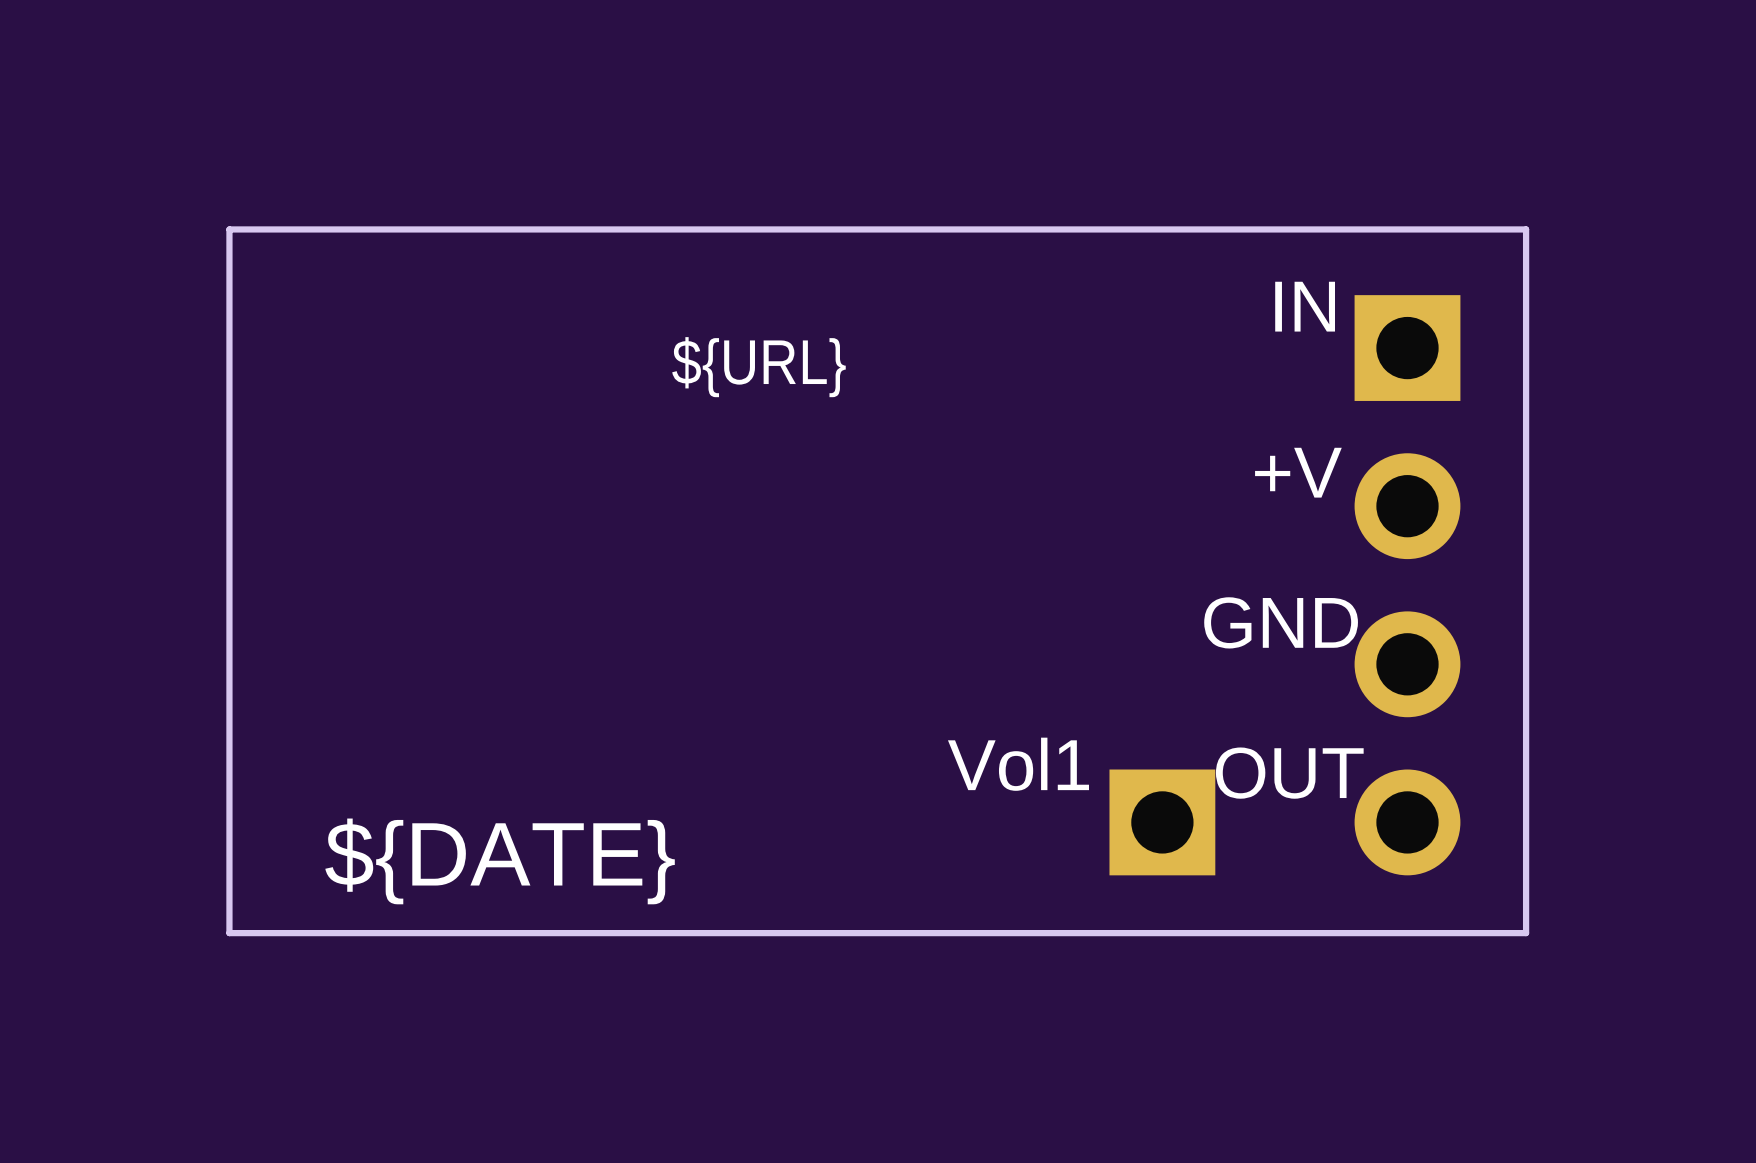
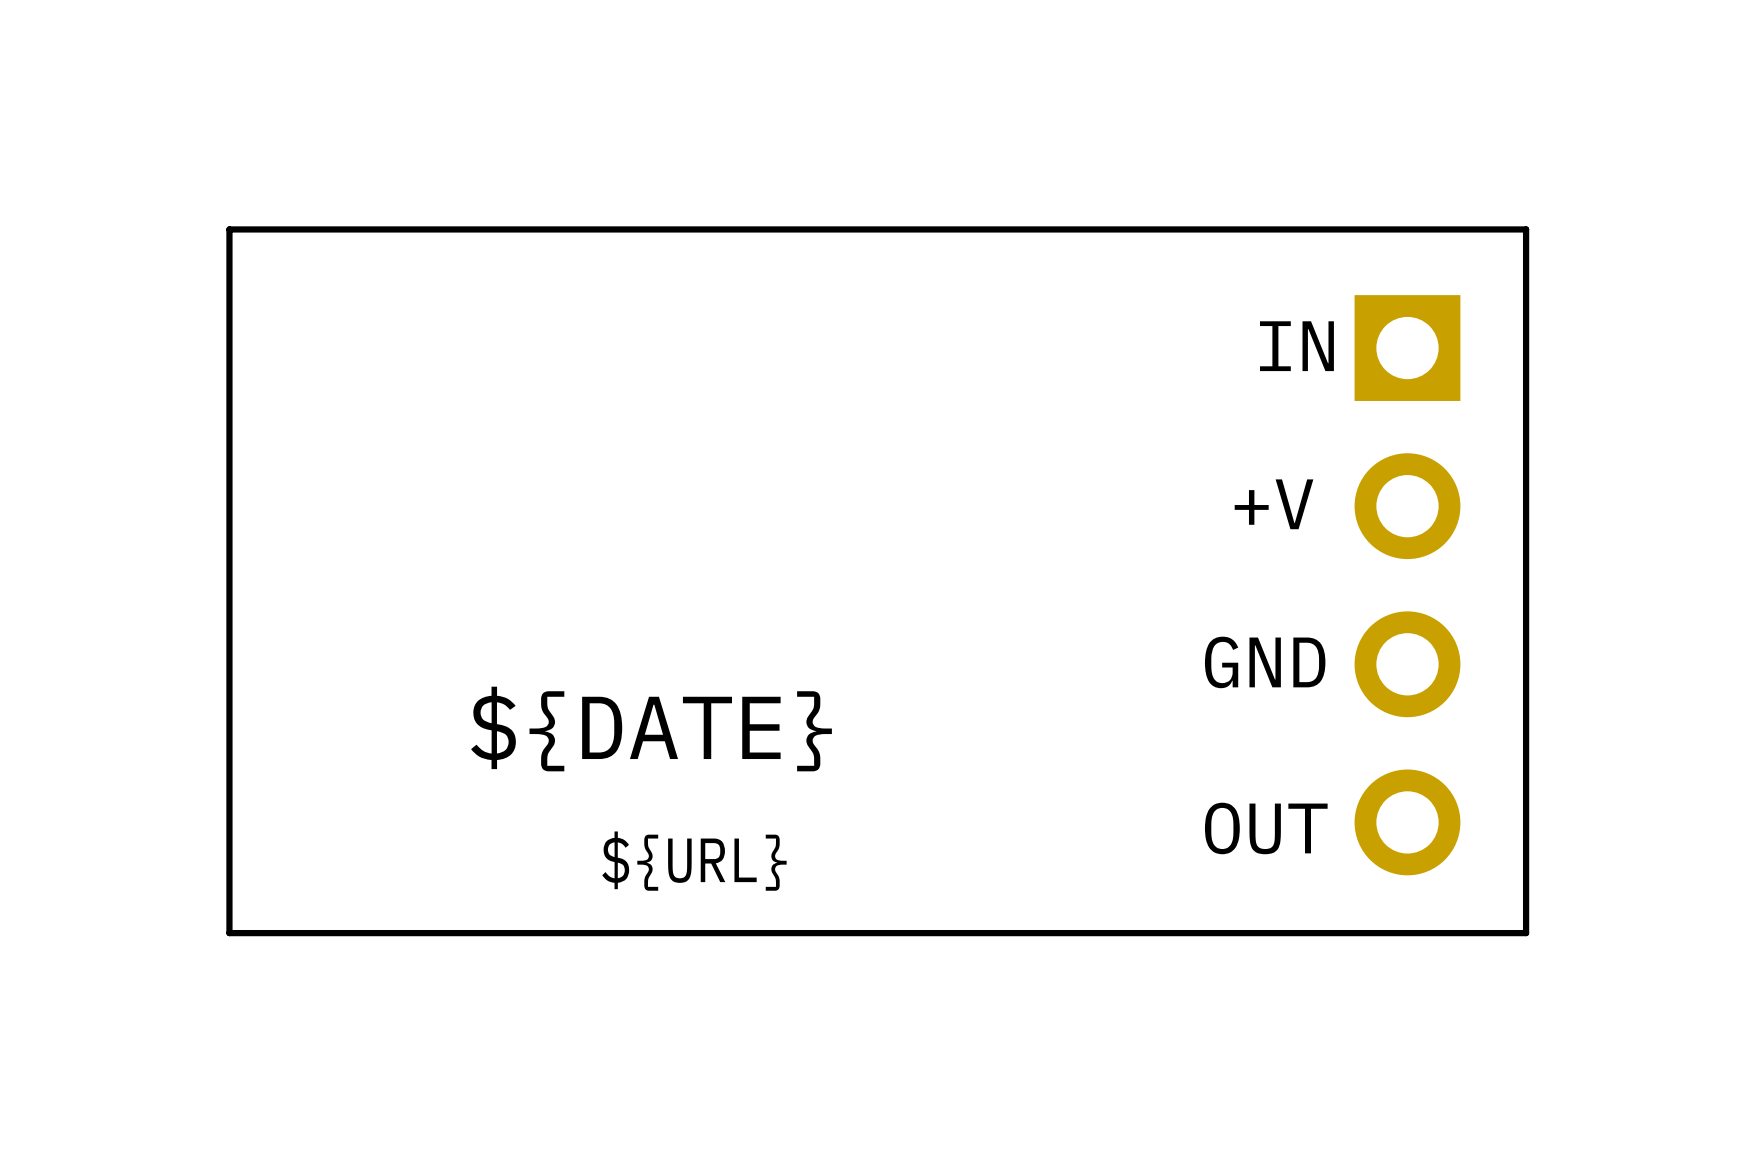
text position: IN (1305, 306) -> IN (1296, 346)
text position: ${URL} (758, 367) -> ${URL} (694, 861)
text position: +V (1298, 472) -> +V (1274, 504)
text position: GND (1281, 622) -> GND (1265, 662)
text: Vol1 (1018, 764) -> none
text position: OUT (1289, 773) -> OUT (1266, 828)
part: (1162, 822) -> none
text position: ${DATE} (500, 861) -> ${DATE} (651, 729)

